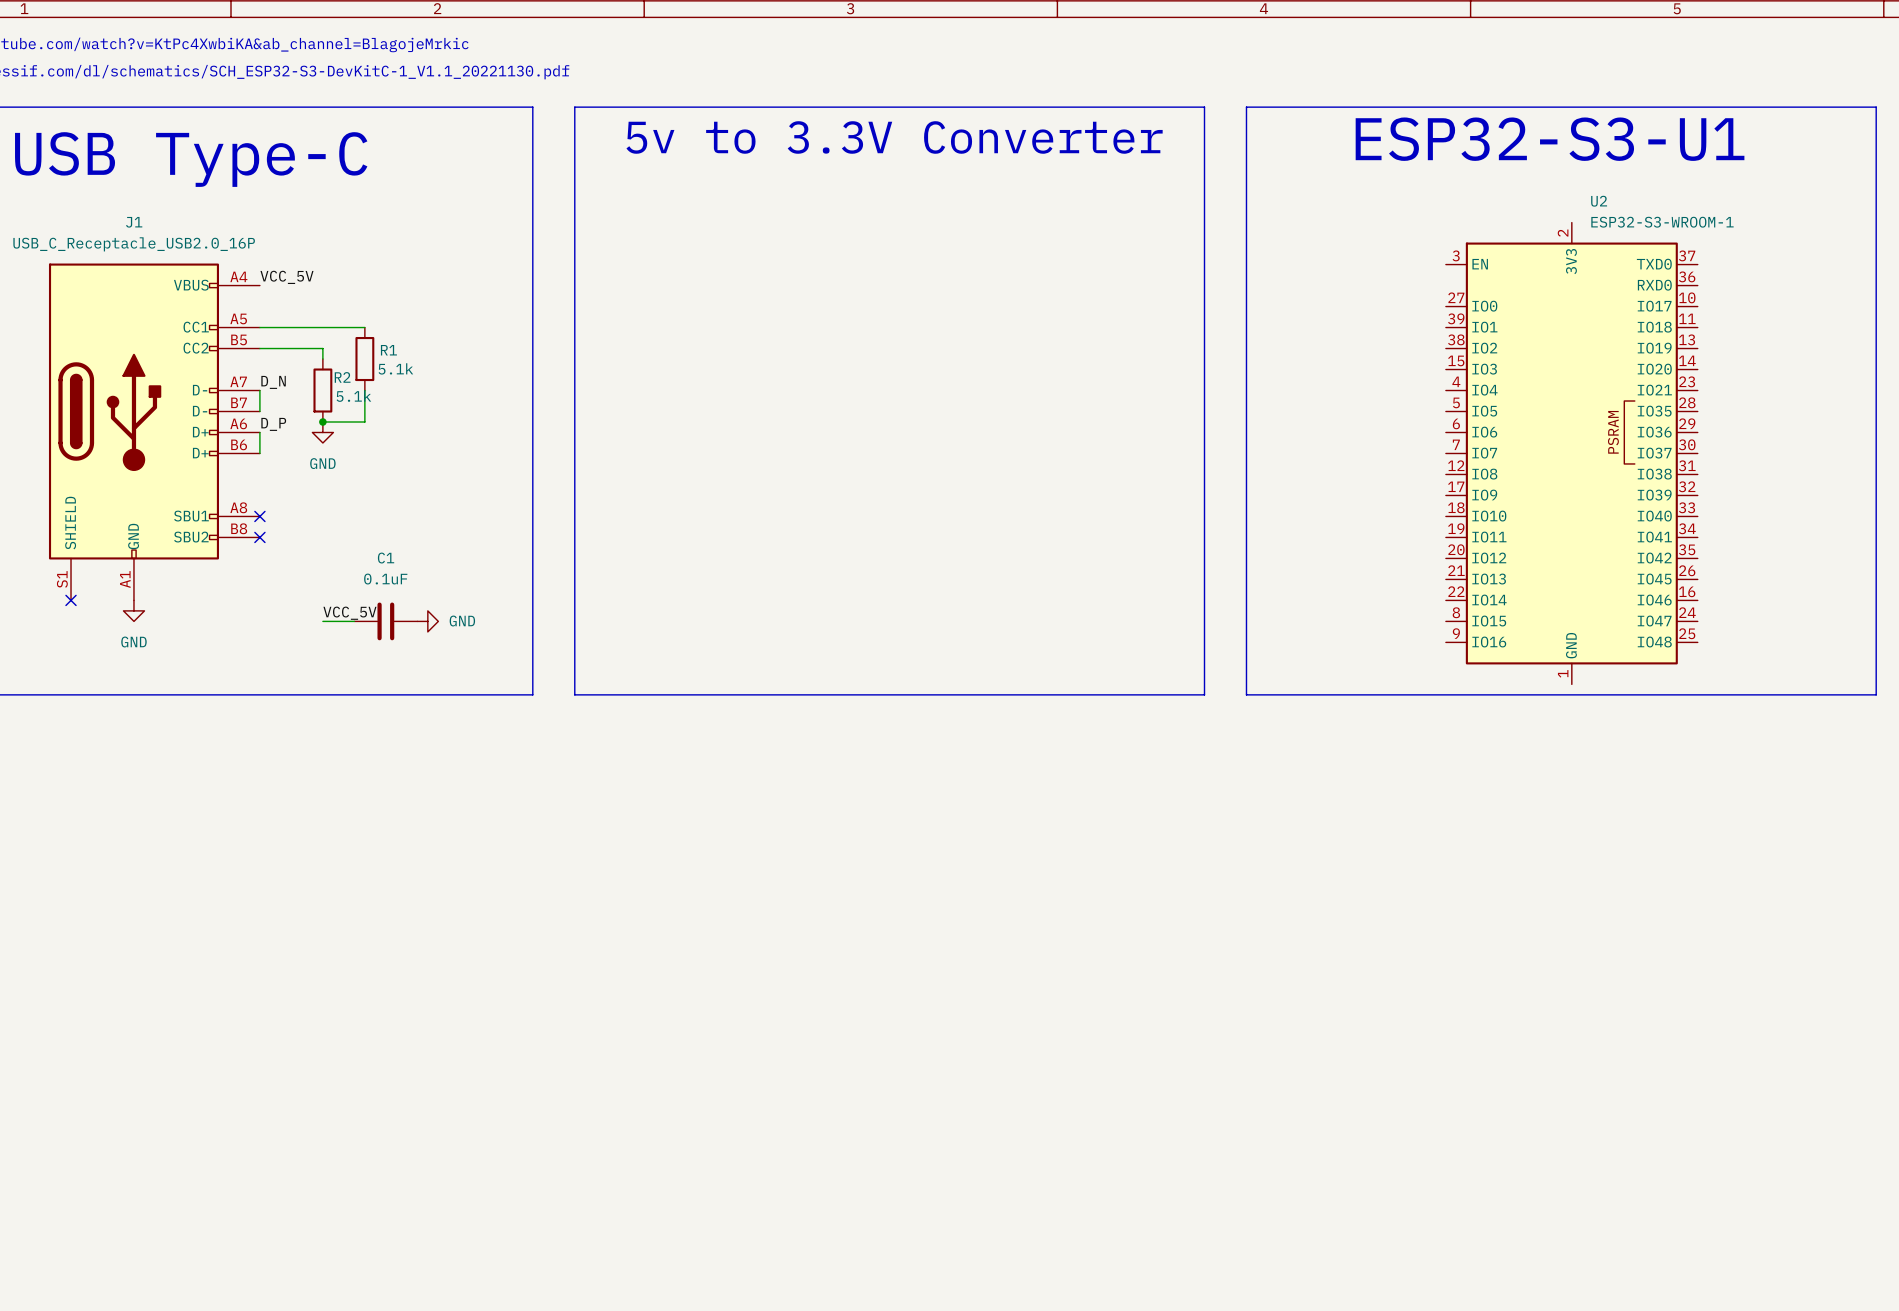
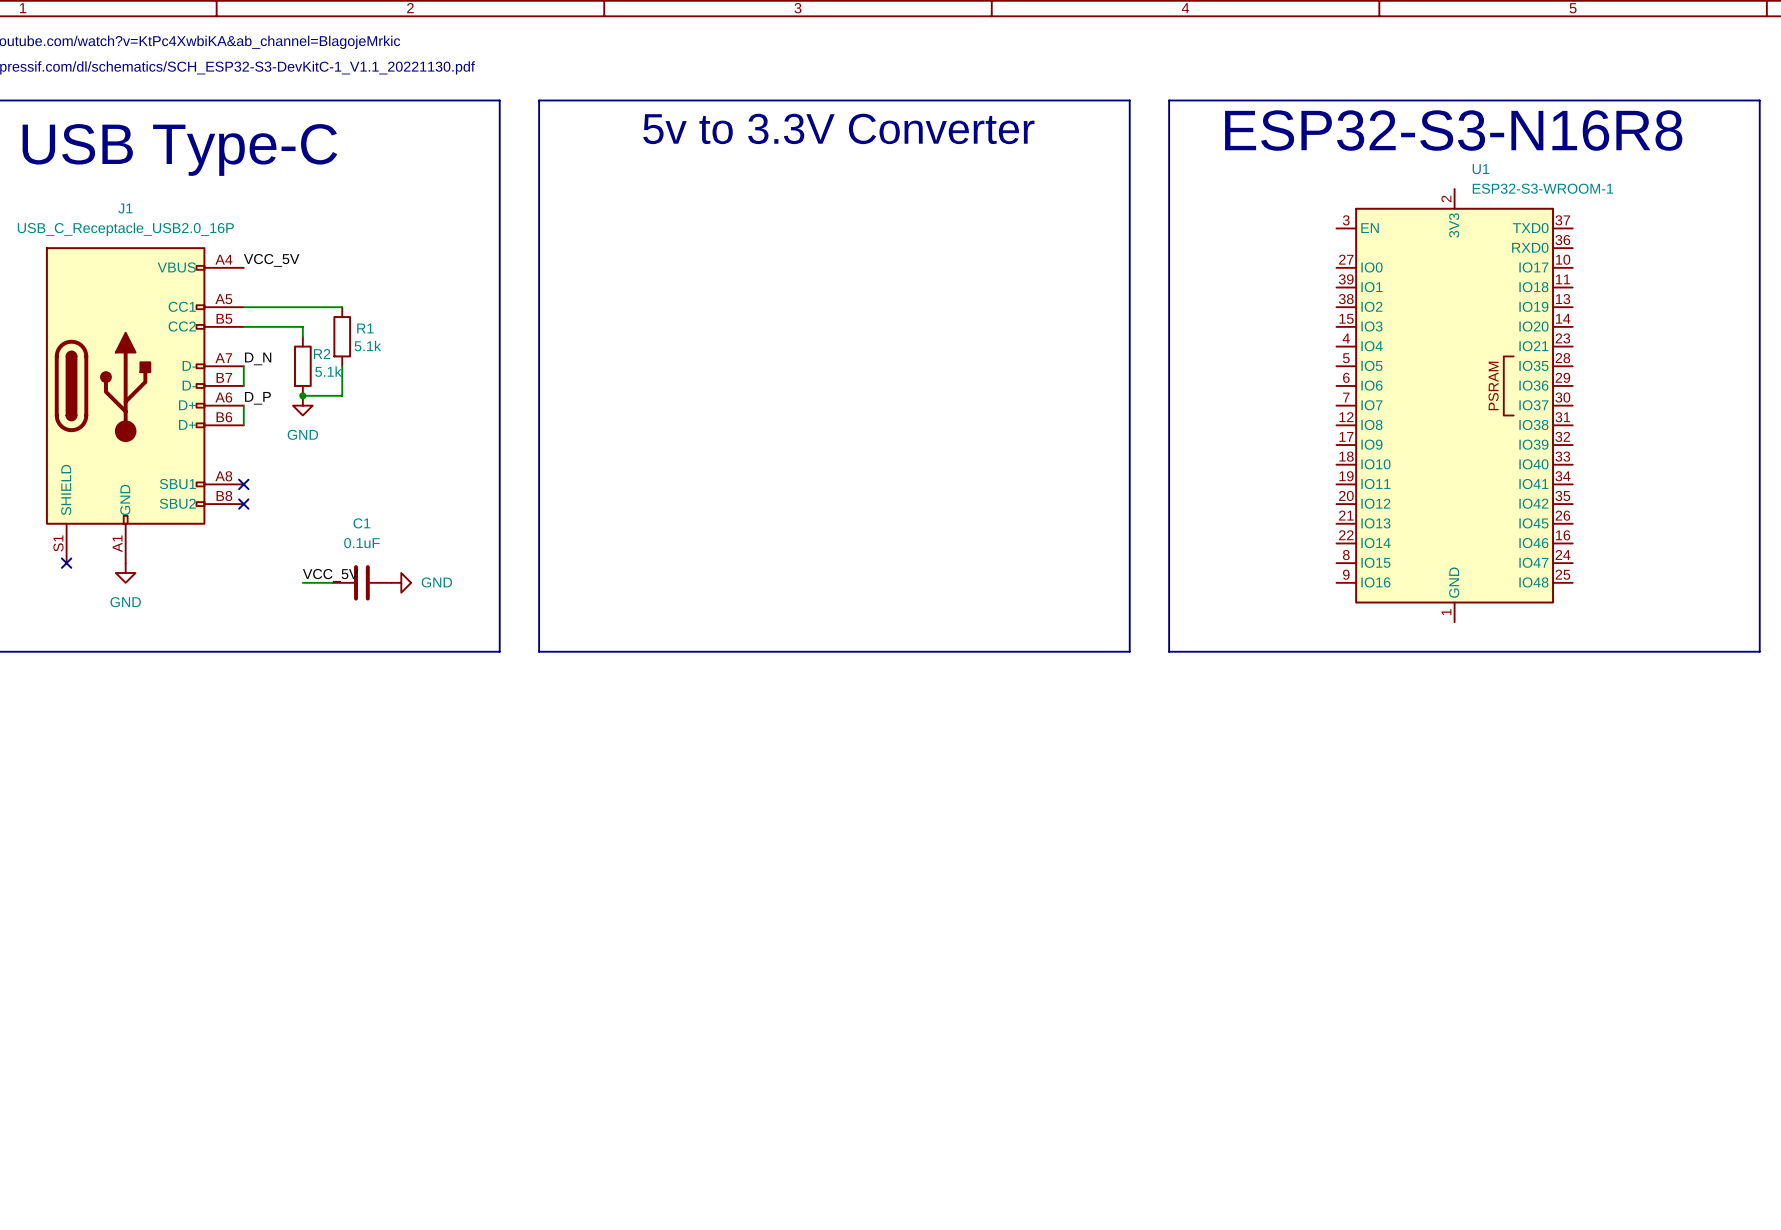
text: ESP32-S3-U1 (1550, 139) -> ESP32-S3-N16R8 (1453, 130)
U1: none -> ESP32-S3-WROOM-1 (1454, 405)
U2: ESP32-S3-WROOM-1 (1571, 453) -> none

